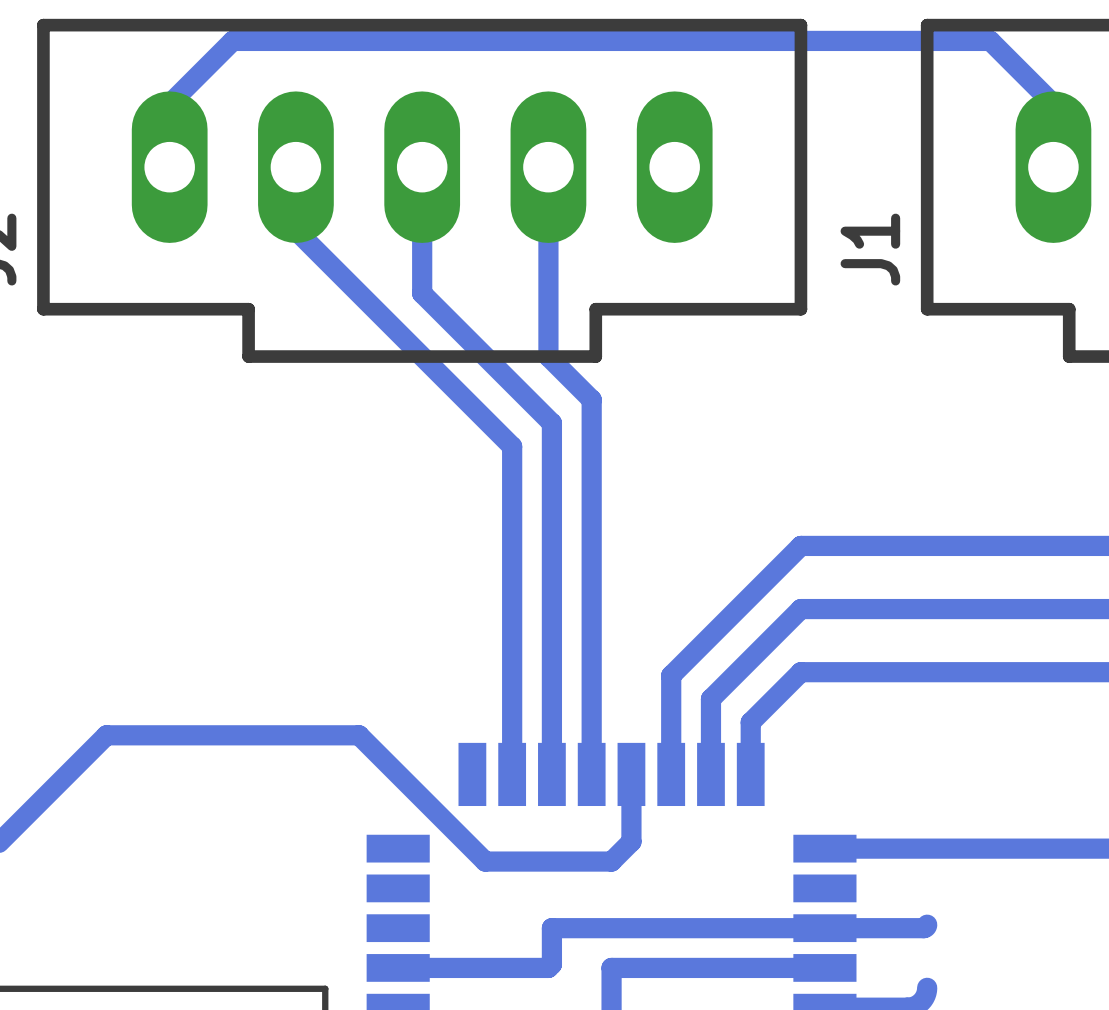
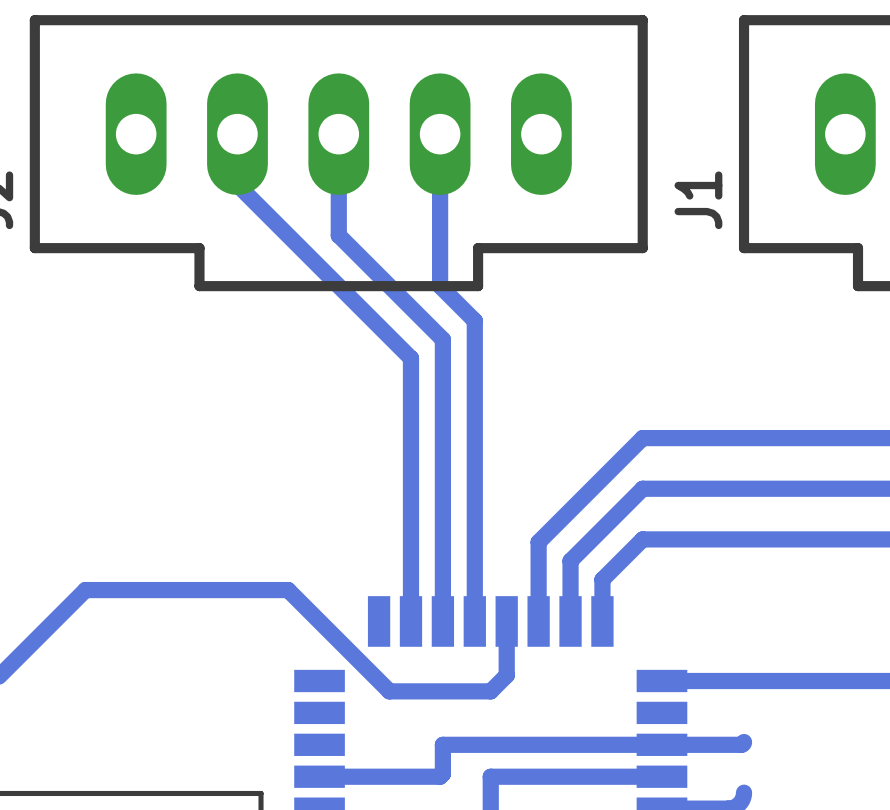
bottom track: (169, 167) (169, 104) (232, 40) (990, 40) (1053, 104) (1053, 167) -> none

